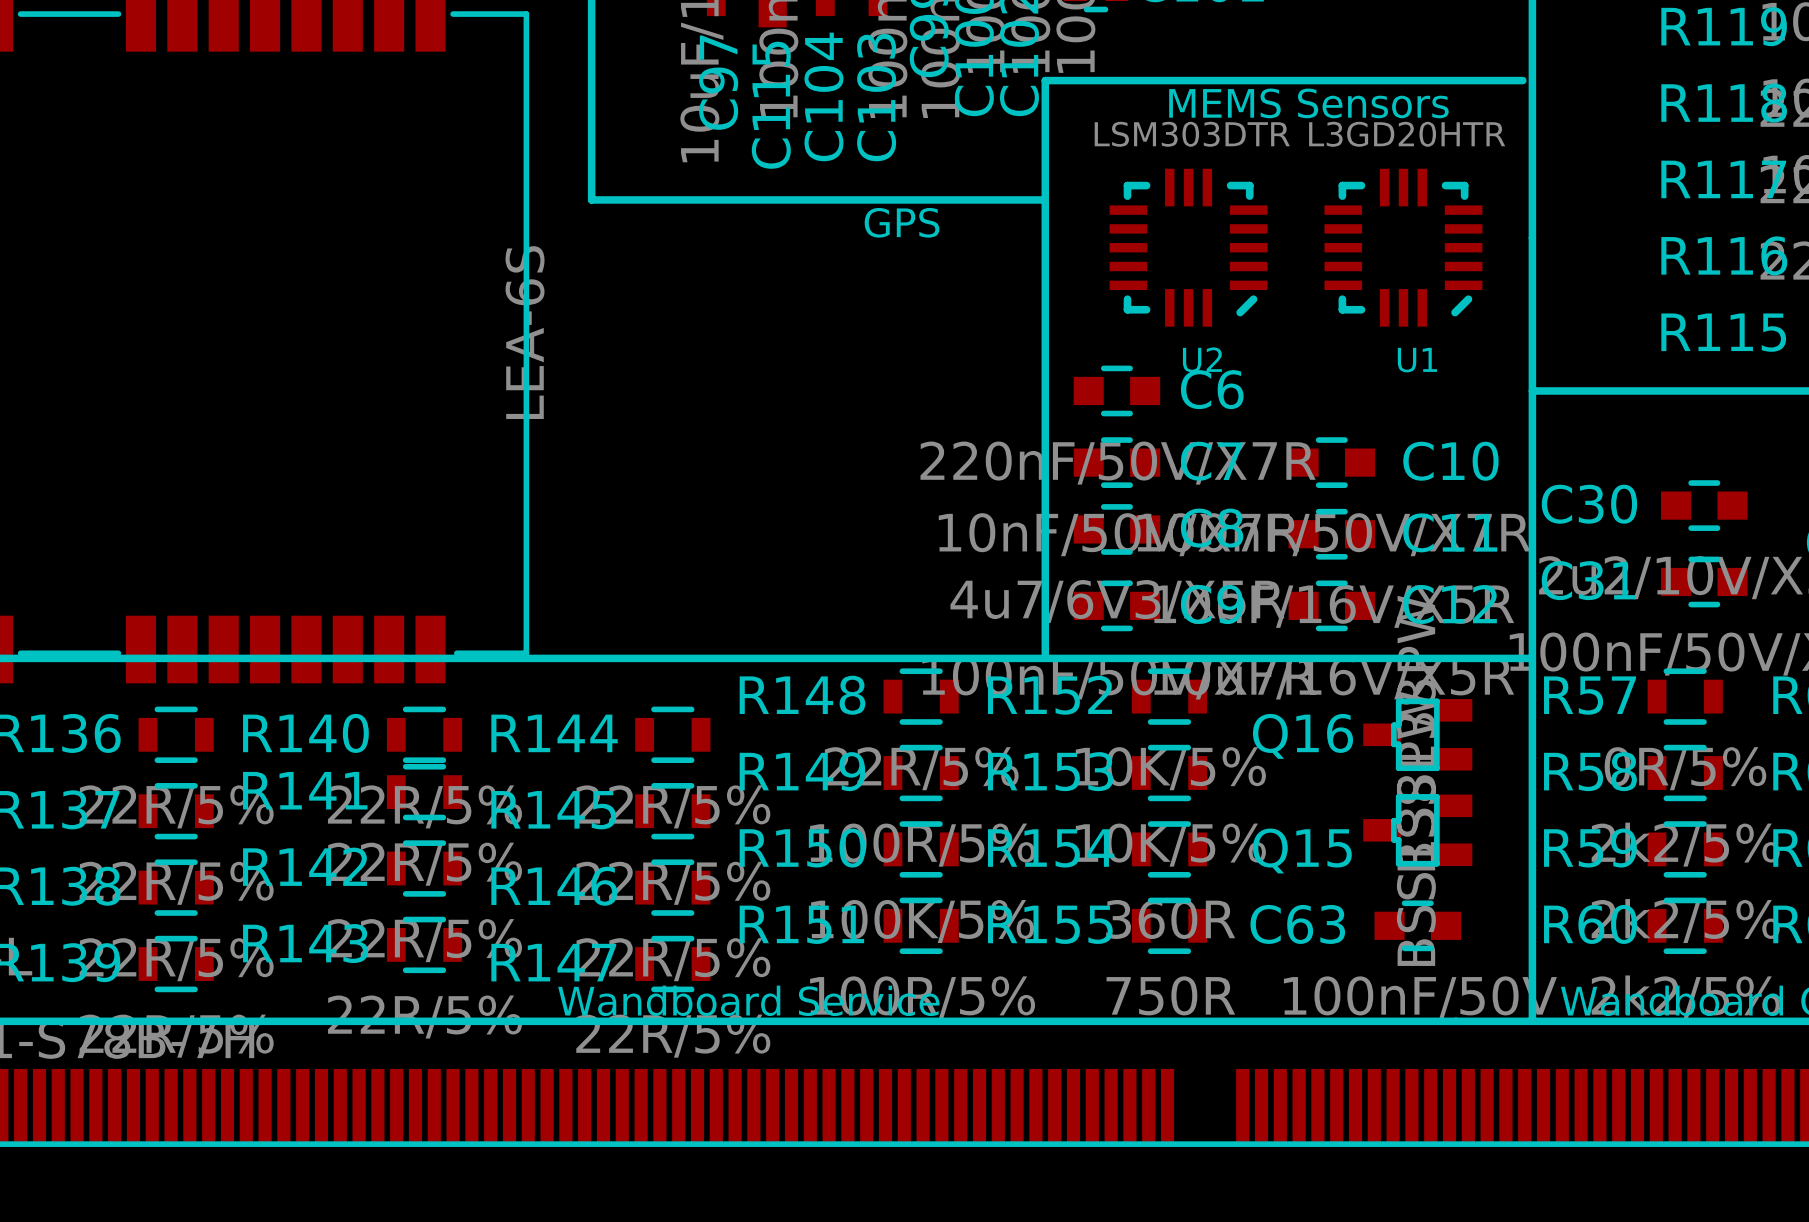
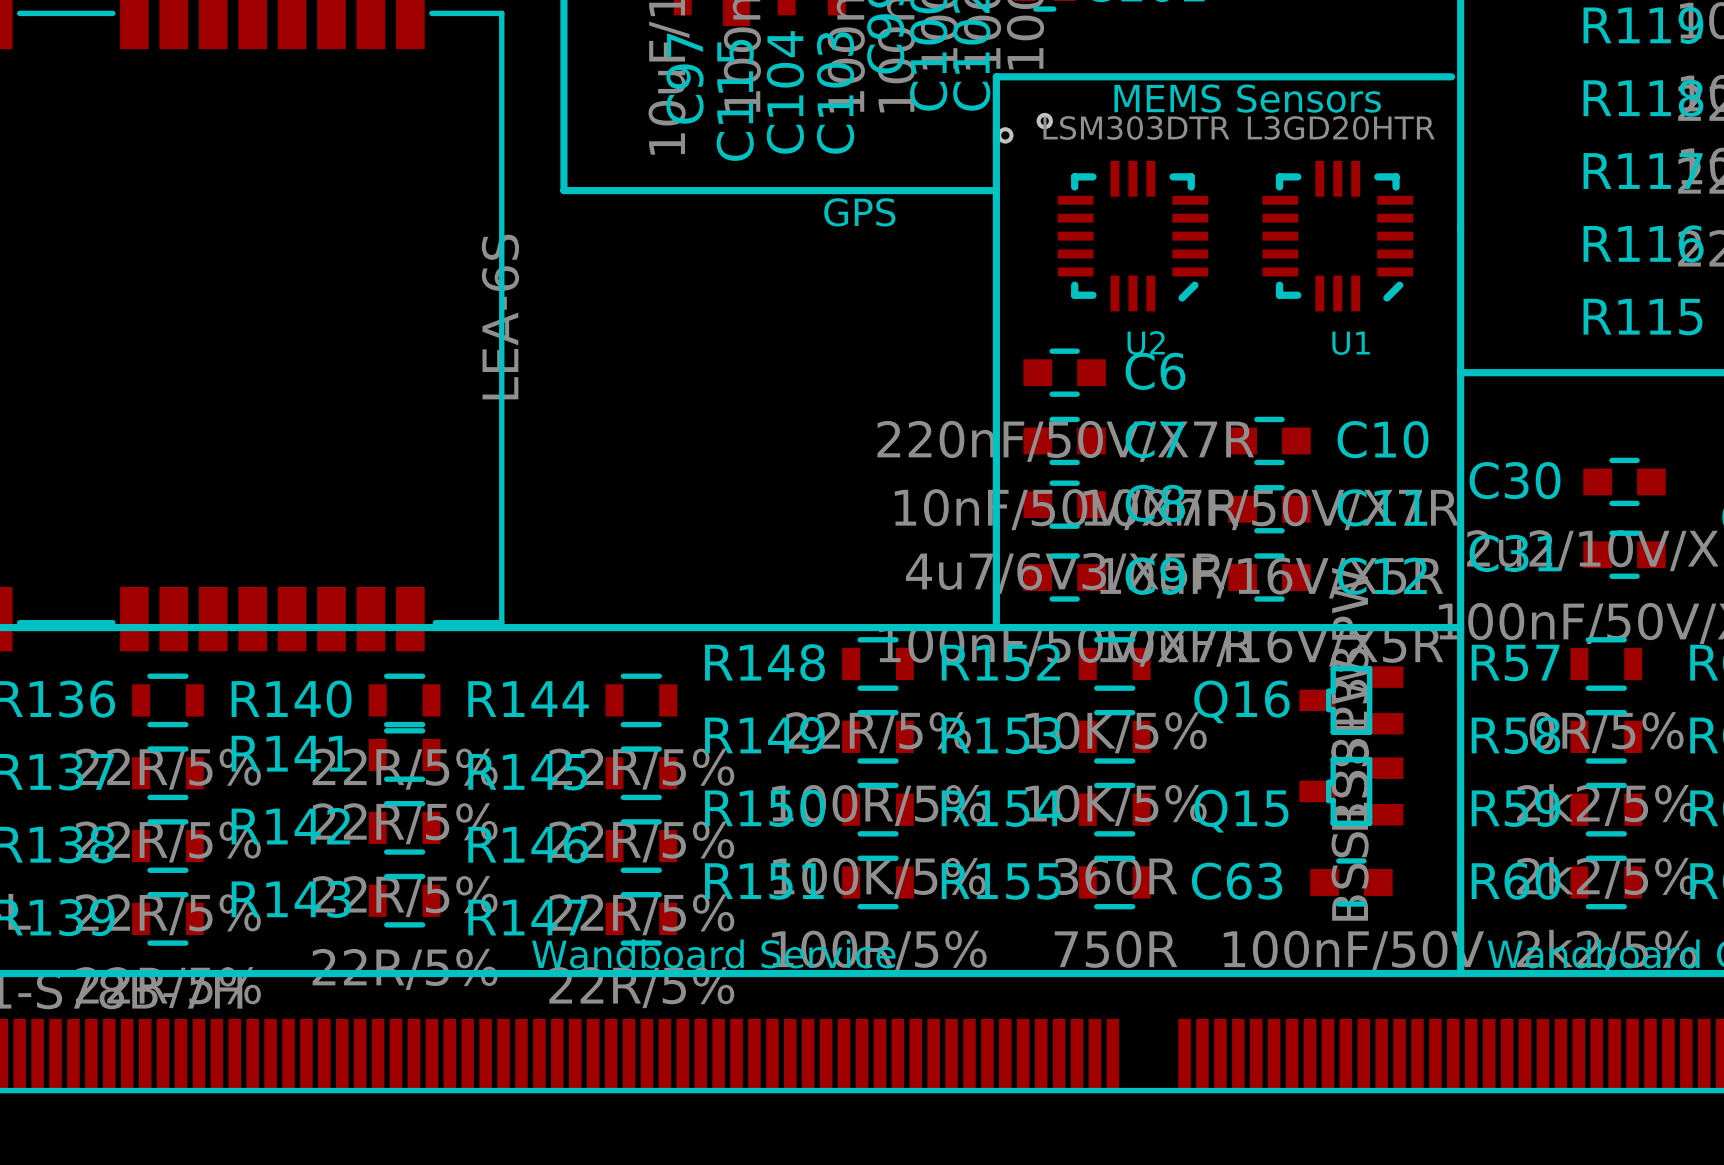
via: none -> (1044, 121)
via: none -> (1005, 135)

